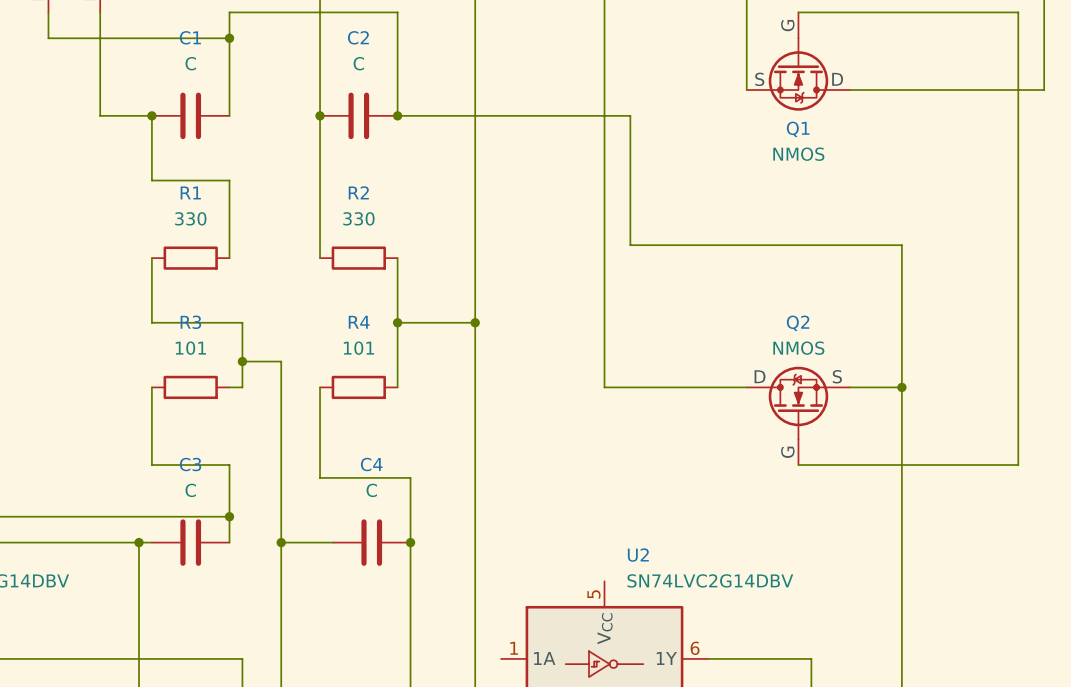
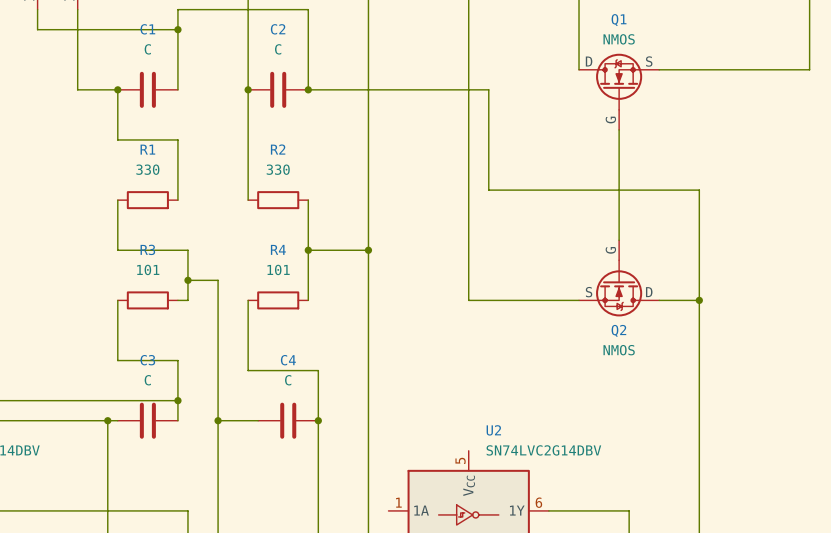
wire: (798, 12) (1018, 12) (1018, 465) (798, 465) -> none
Q1 rotation: 0° (798, 74) -> 180° (619, 81)
Q1 name position: Q1 (798, 129) -> Q1 (619, 20)
Q1 value position: NMOS (798, 154) -> NMOS (619, 39)
wire: none -> (619, 129) (619, 240)
Q2 name position: Q2 (798, 323) -> Q2 (618, 330)
Q2 value position: NMOS (798, 348) -> NMOS (619, 350)
Q2 rotation: 0° (798, 402) -> 180° (619, 288)

